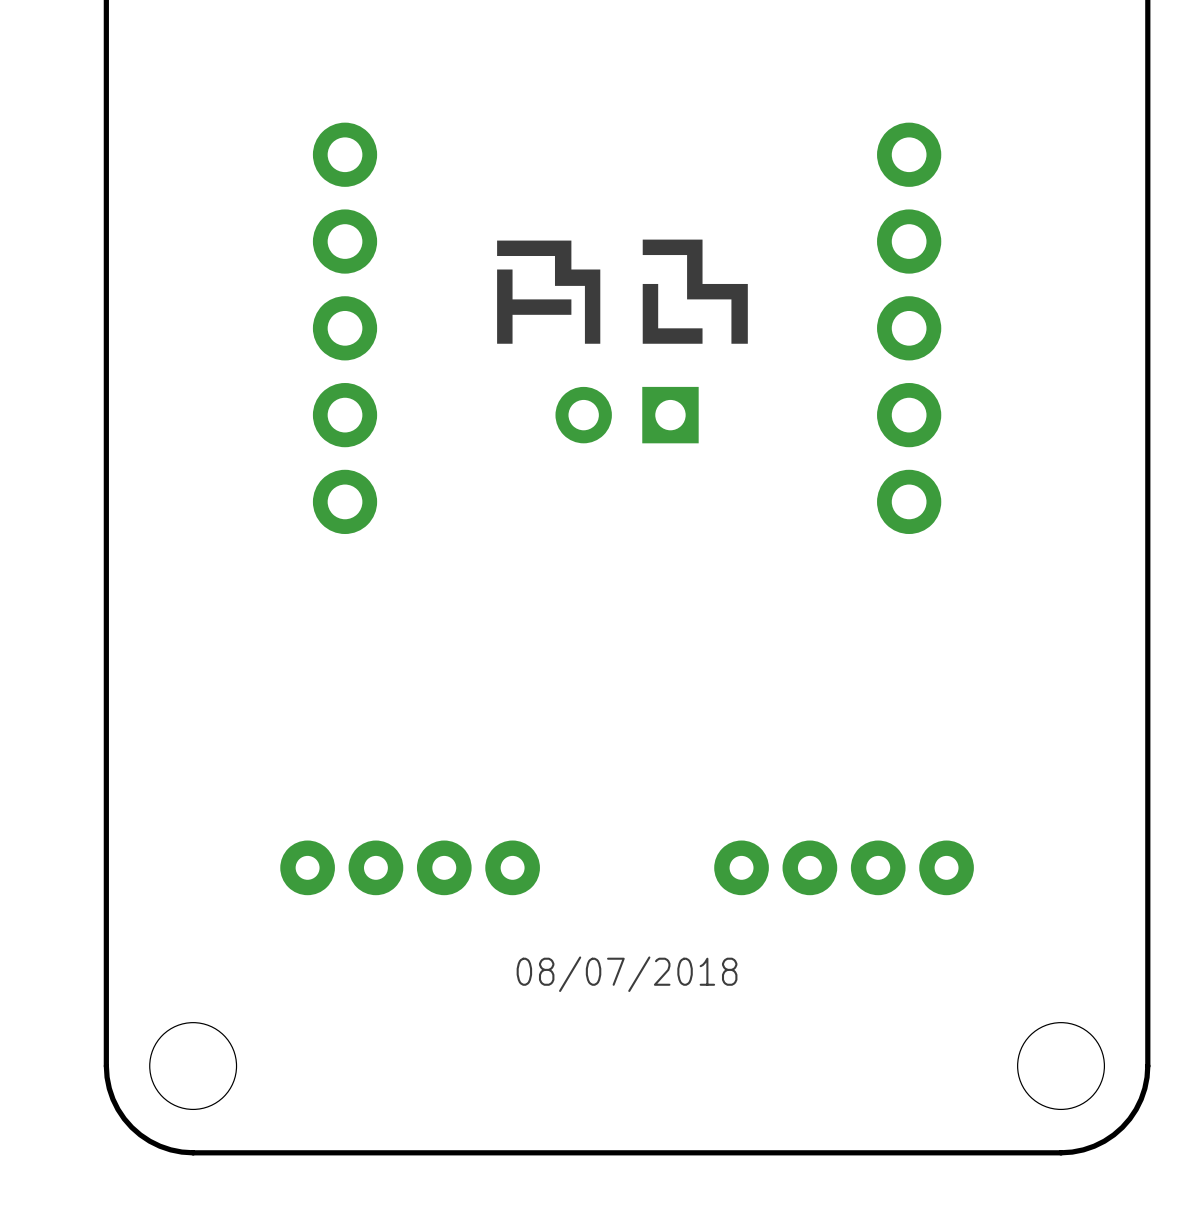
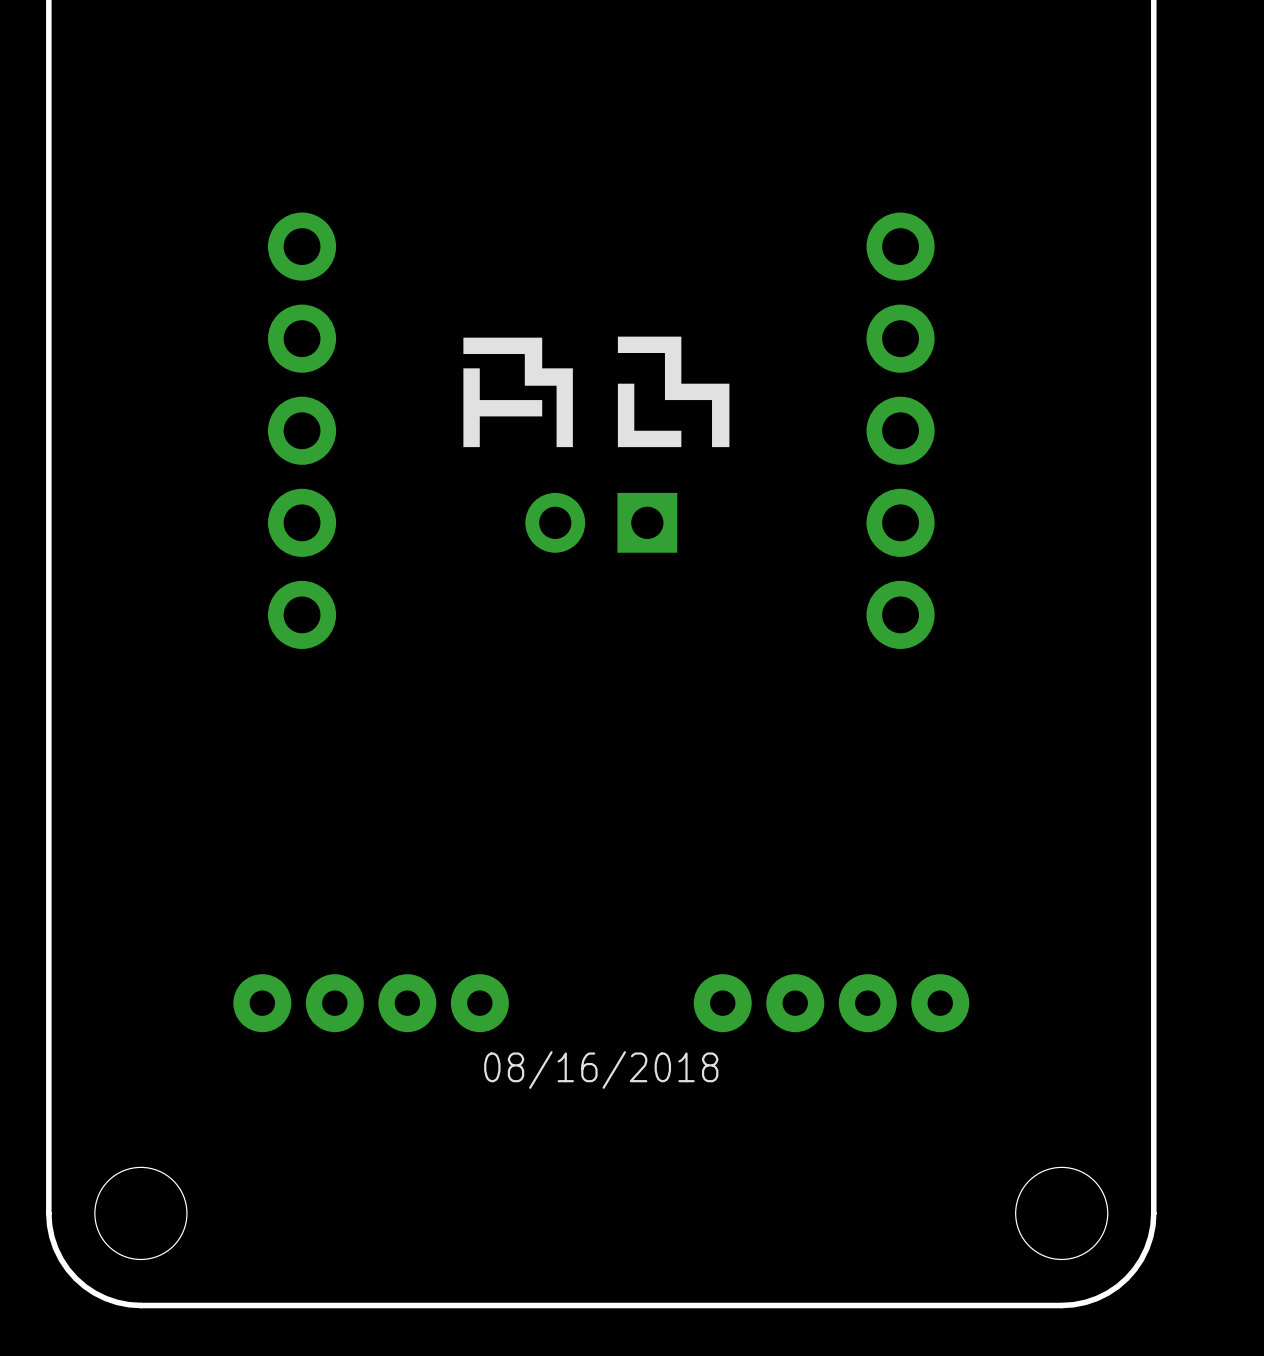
text: 08/07/2018 (627, 974) -> 08/16/2018 (601, 1069)

